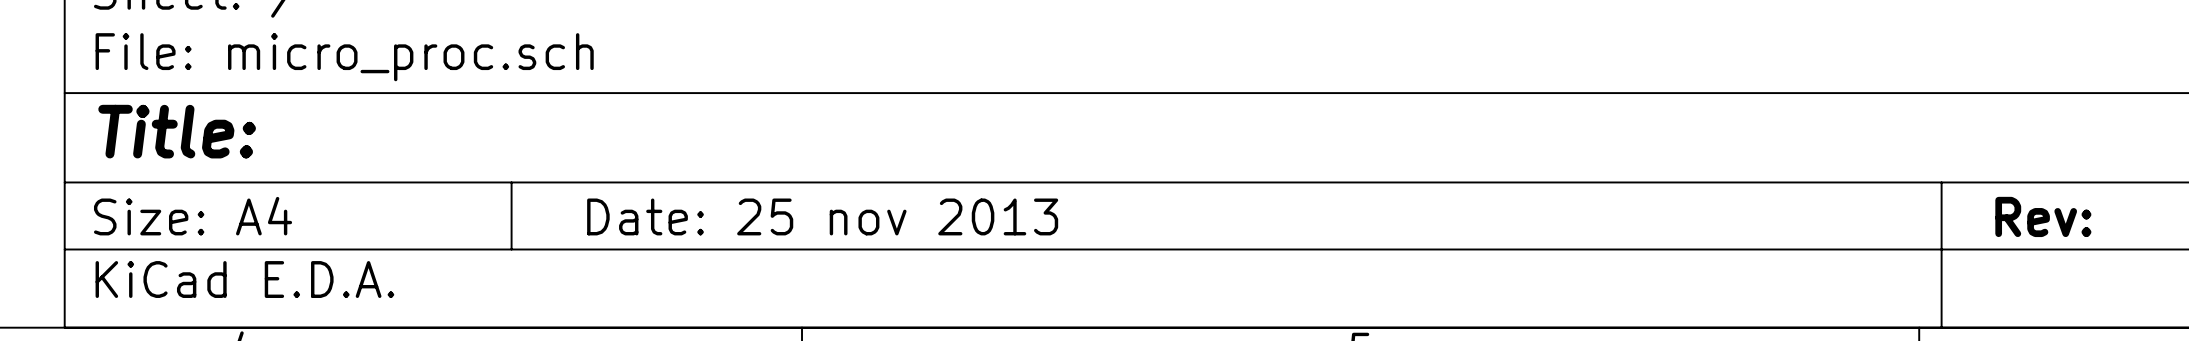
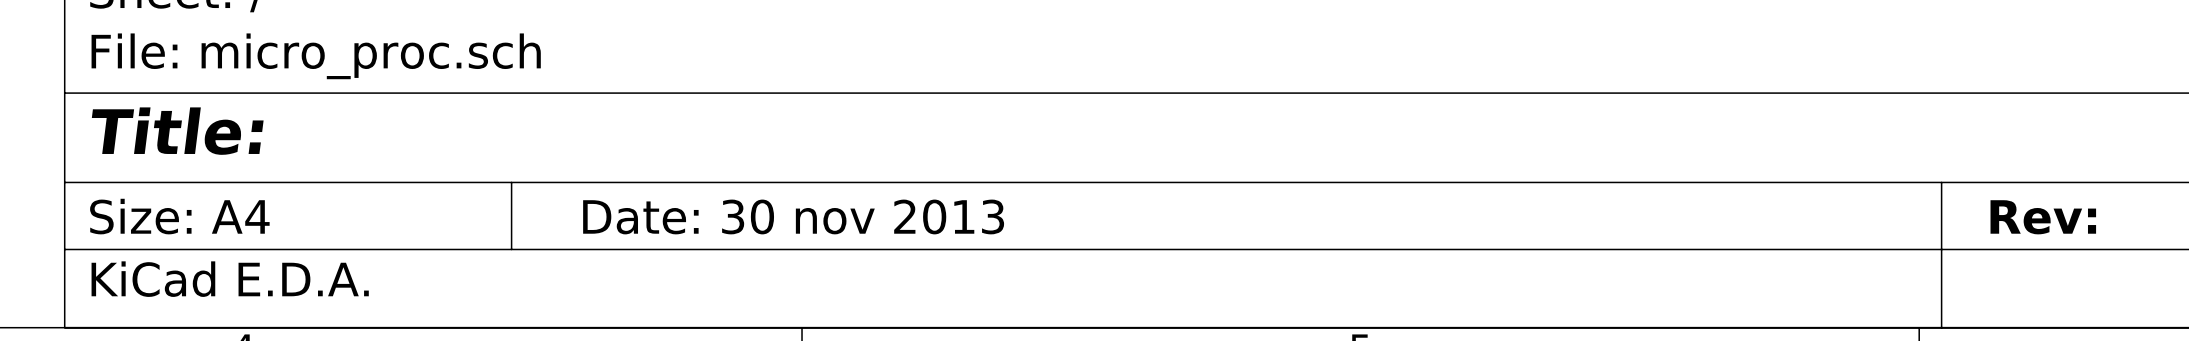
title block: Date: 25 nov 2013 (822, 216) -> Date: 30 nov 2013 (793, 216)

